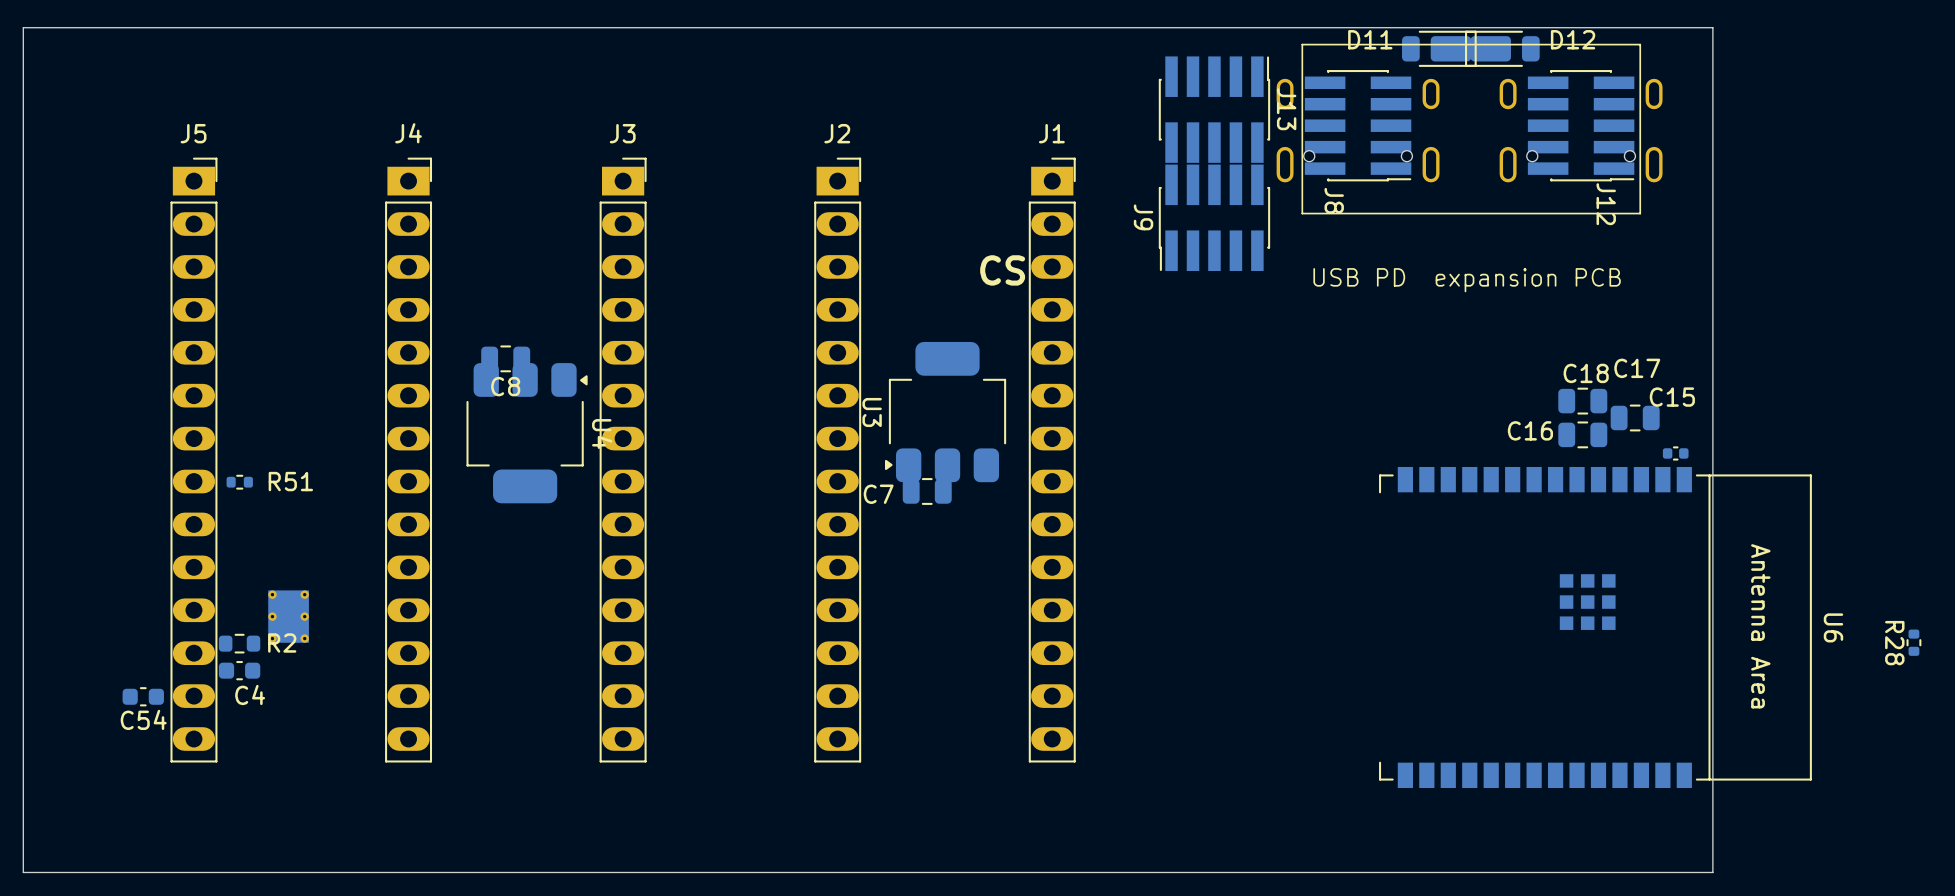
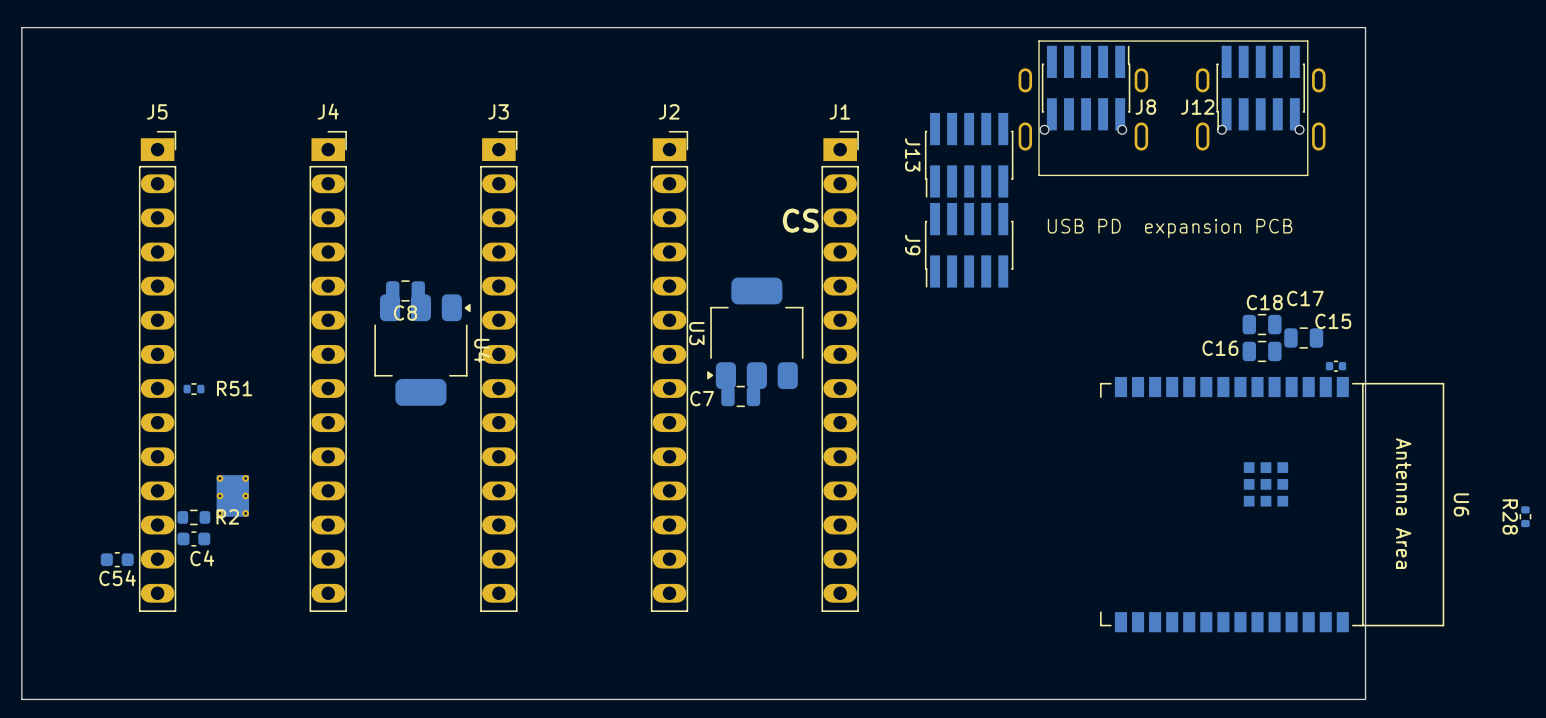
D11: (1439, 48) -> none
D12: (1502, 48) -> none
J13 rotation: 0° (1214, 109) -> 180° (969, 155)
J13 position: (1214, 109) -> (969, 155)
J8 rotation: 0° (1358, 125) -> 90° counterclockwise (1086, 88)
J12 rotation: 0° (1581, 125) -> 90° clockwise (1260, 88)
J9 position: (1214, 217) -> (969, 245)

